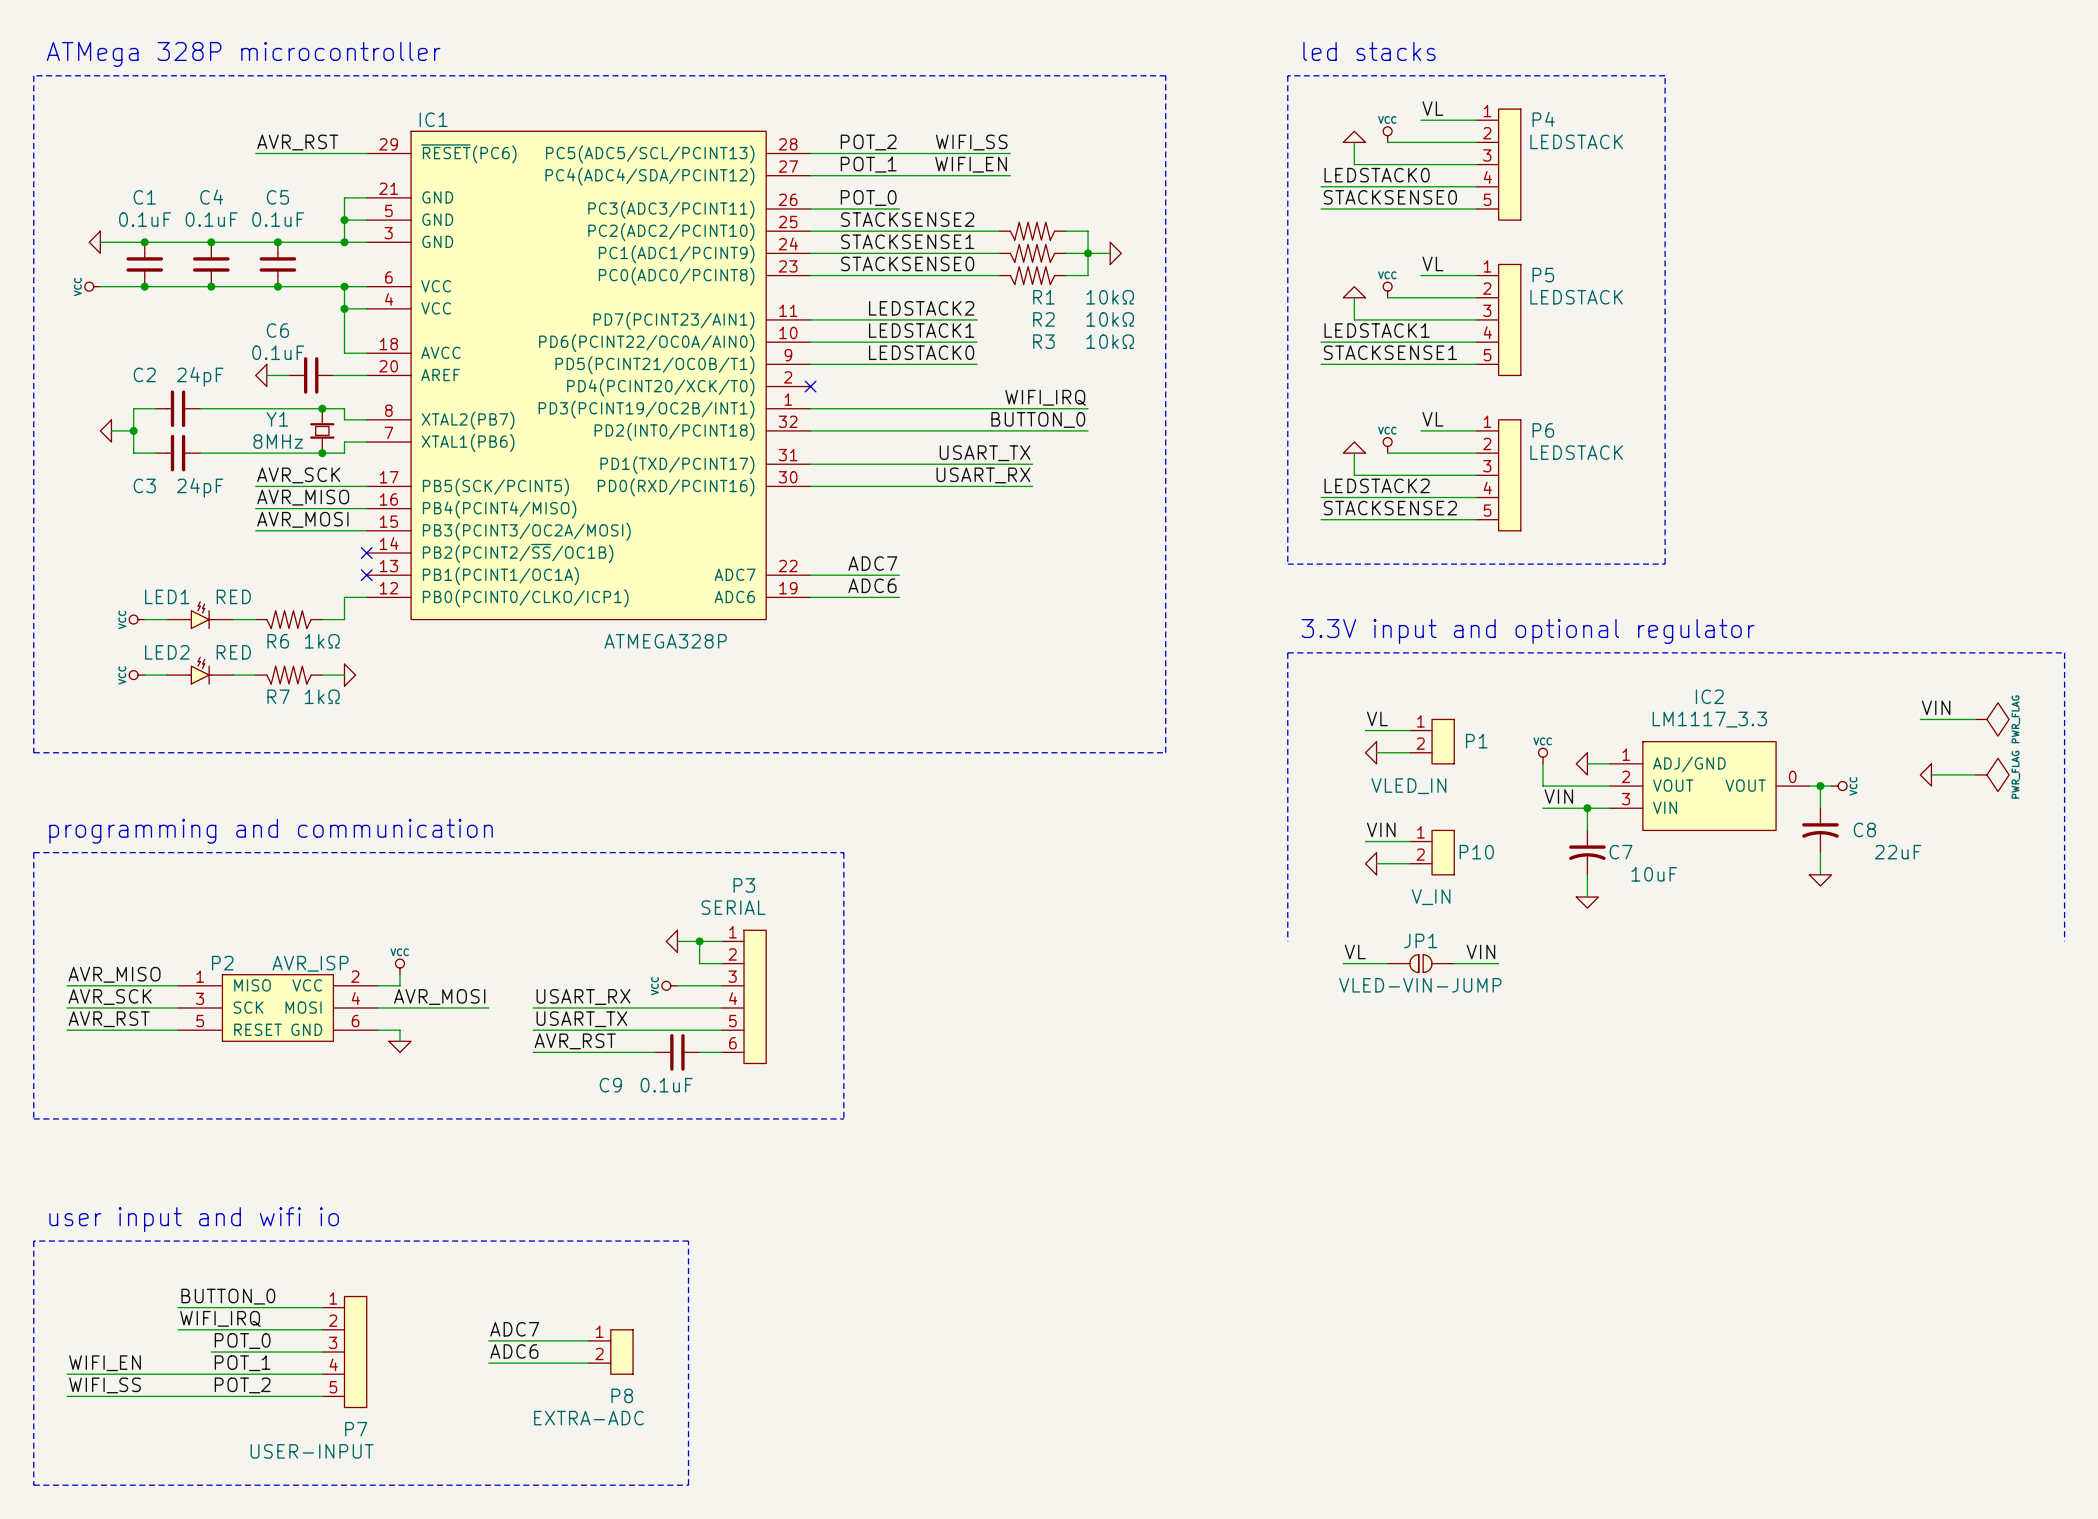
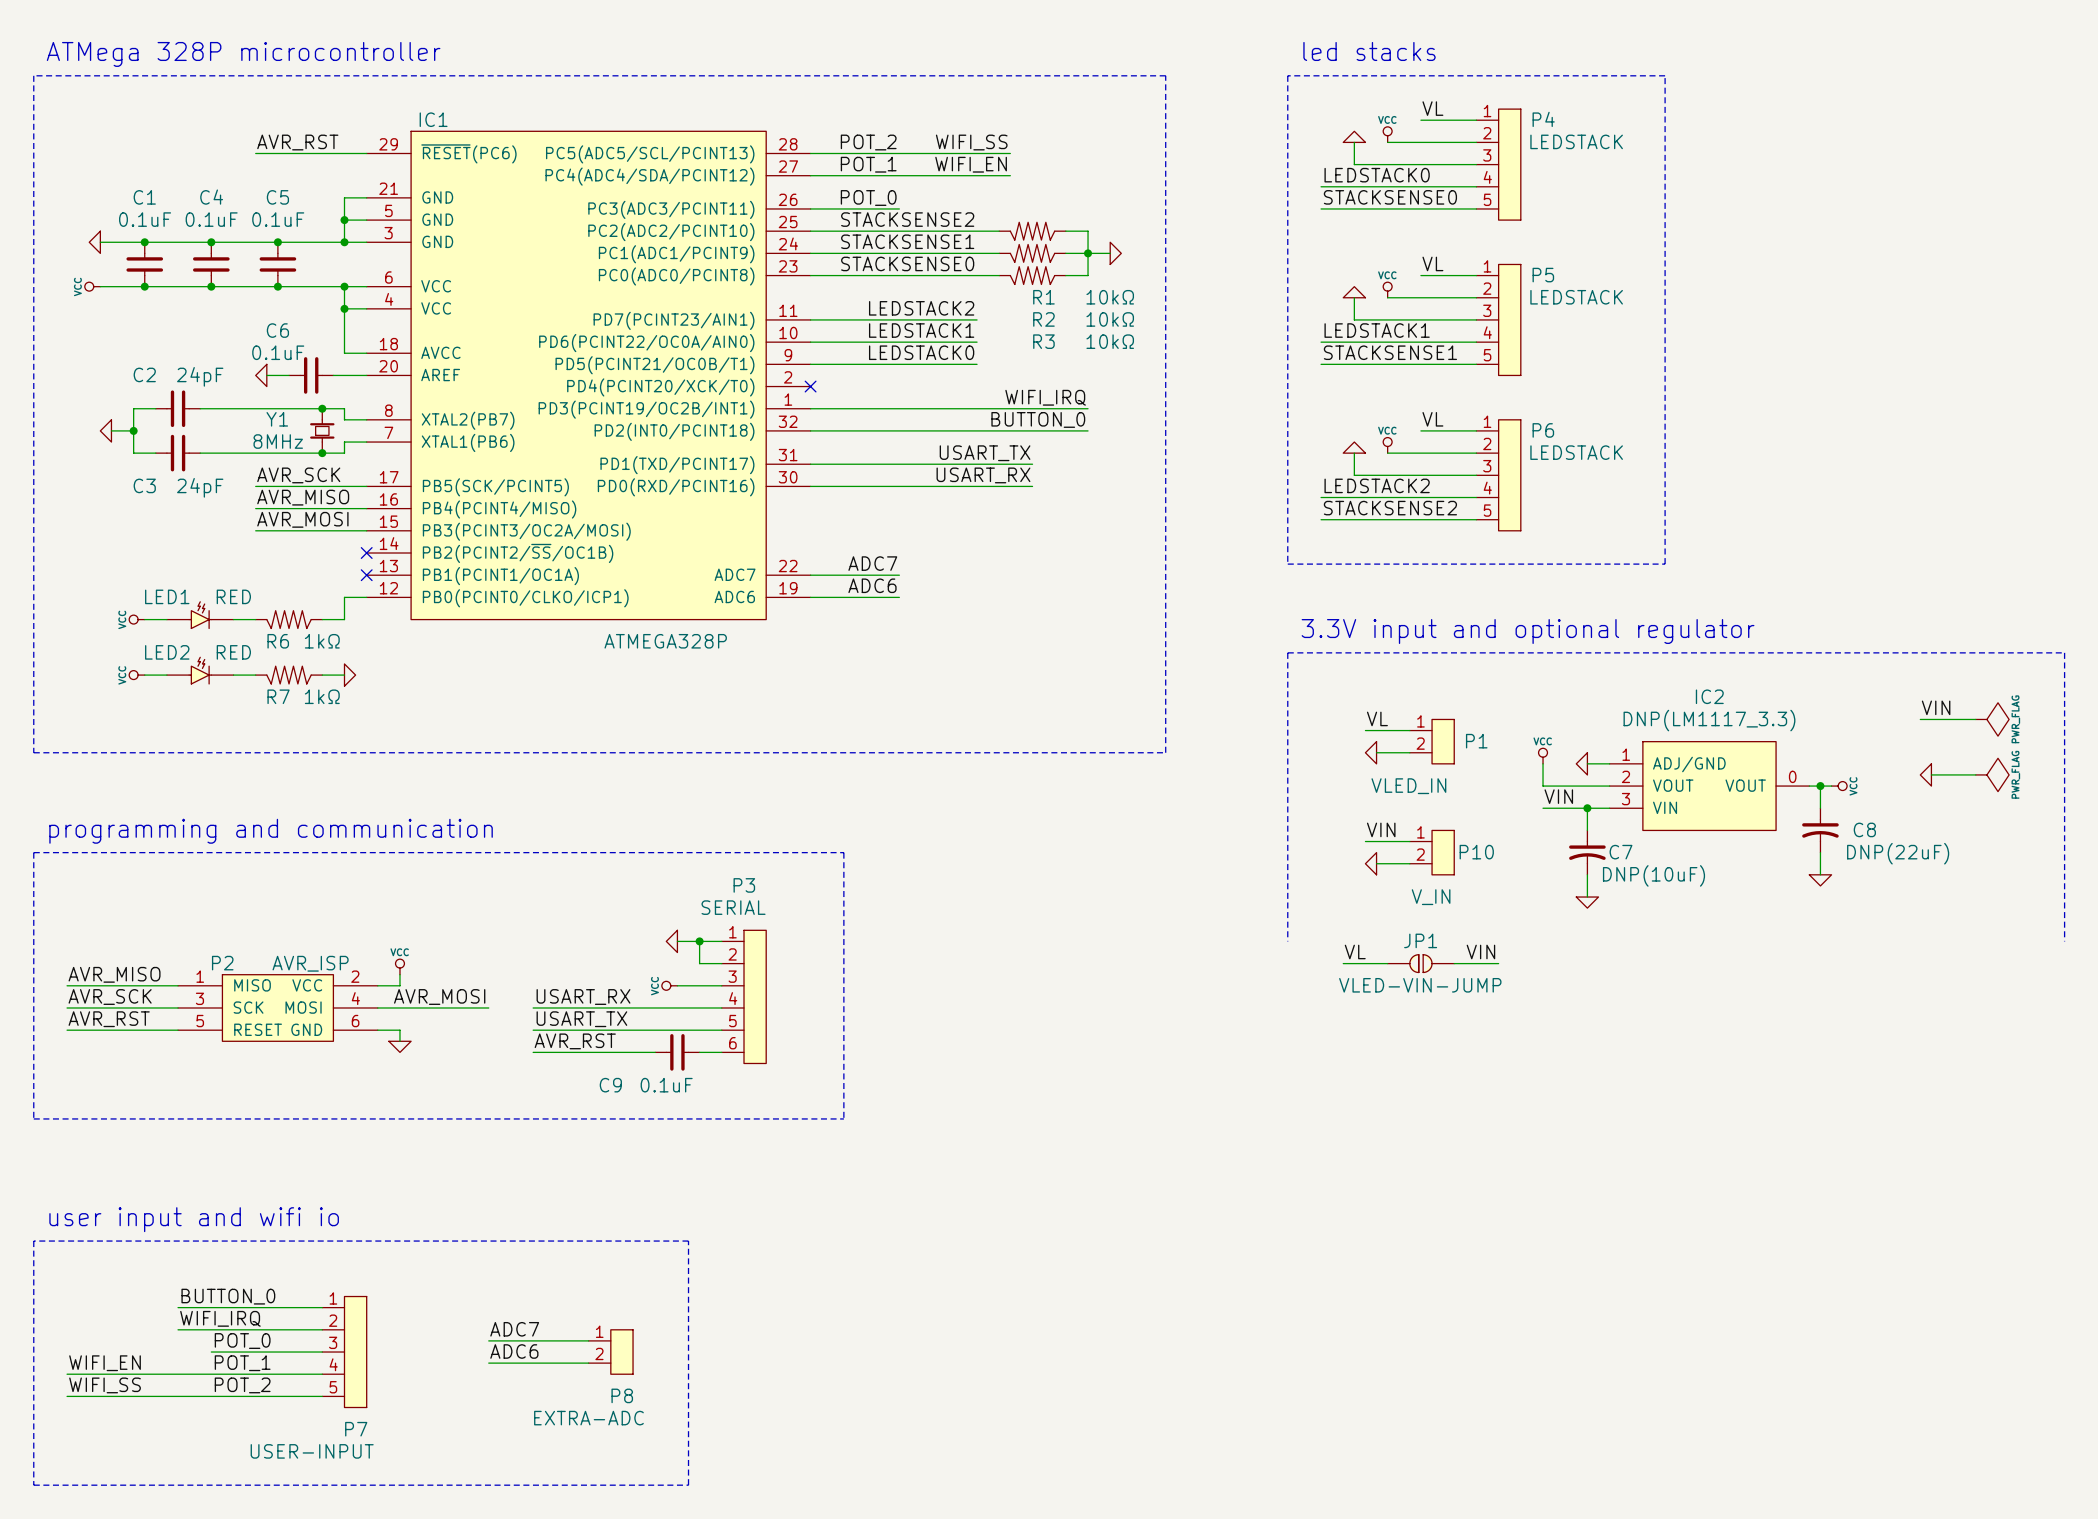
IC2 value: LM1117_3.3 (1709, 719) -> DNP(LM1117_3.3) (1709, 720)
C8 value: 22uF (1898, 852) -> DNP(22uF) (1898, 853)
C7 value: 10uF (1654, 874) -> DNP(10uF) (1653, 875)

